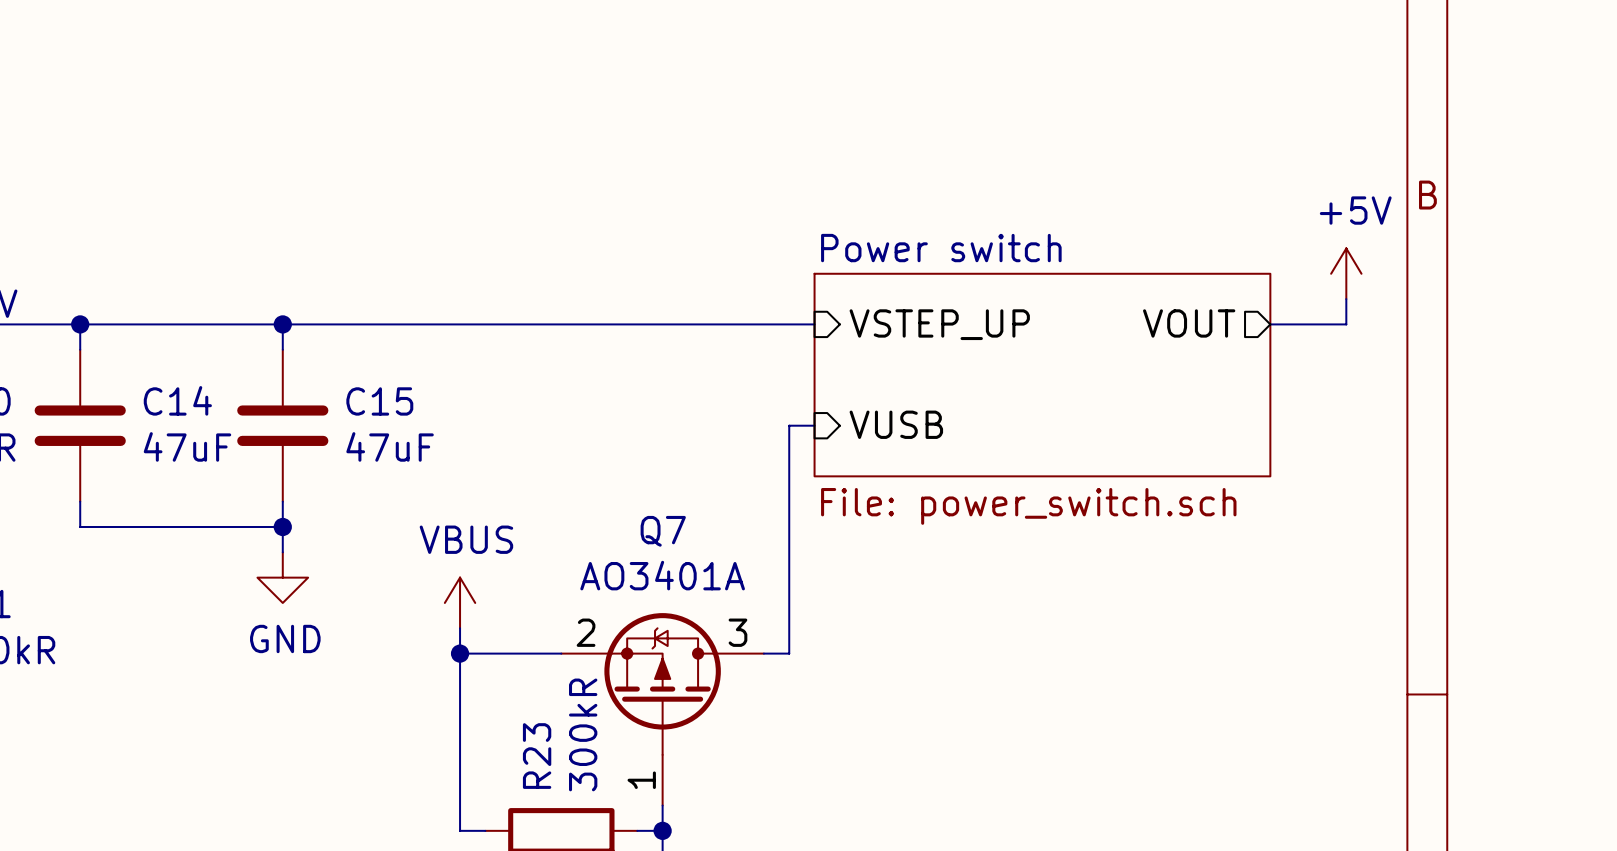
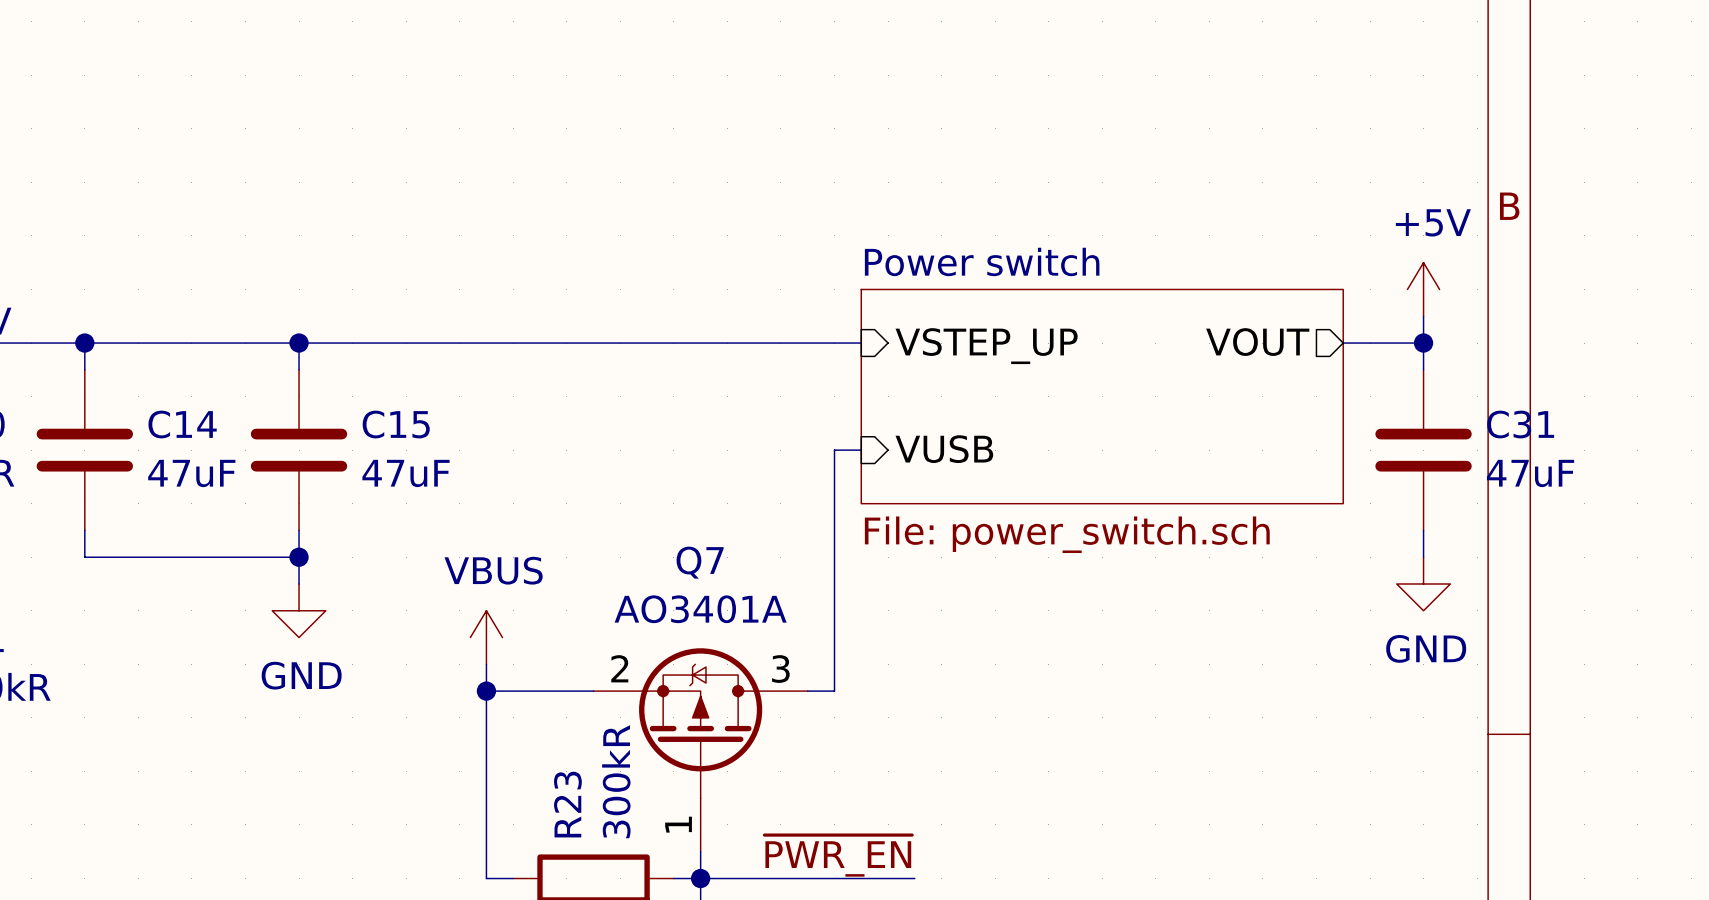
wire: none -> (1423, 343) (1423, 369)
junction: none -> (1423, 343)
C31: none -> 47uF (1423, 450)
wire: none -> (1423, 530) (1423, 557)
power symbol: none -> GND (1423, 584)
label: none -> ~{PWR_EN} (838, 855)
wire: none -> (700, 878) (914, 878)

